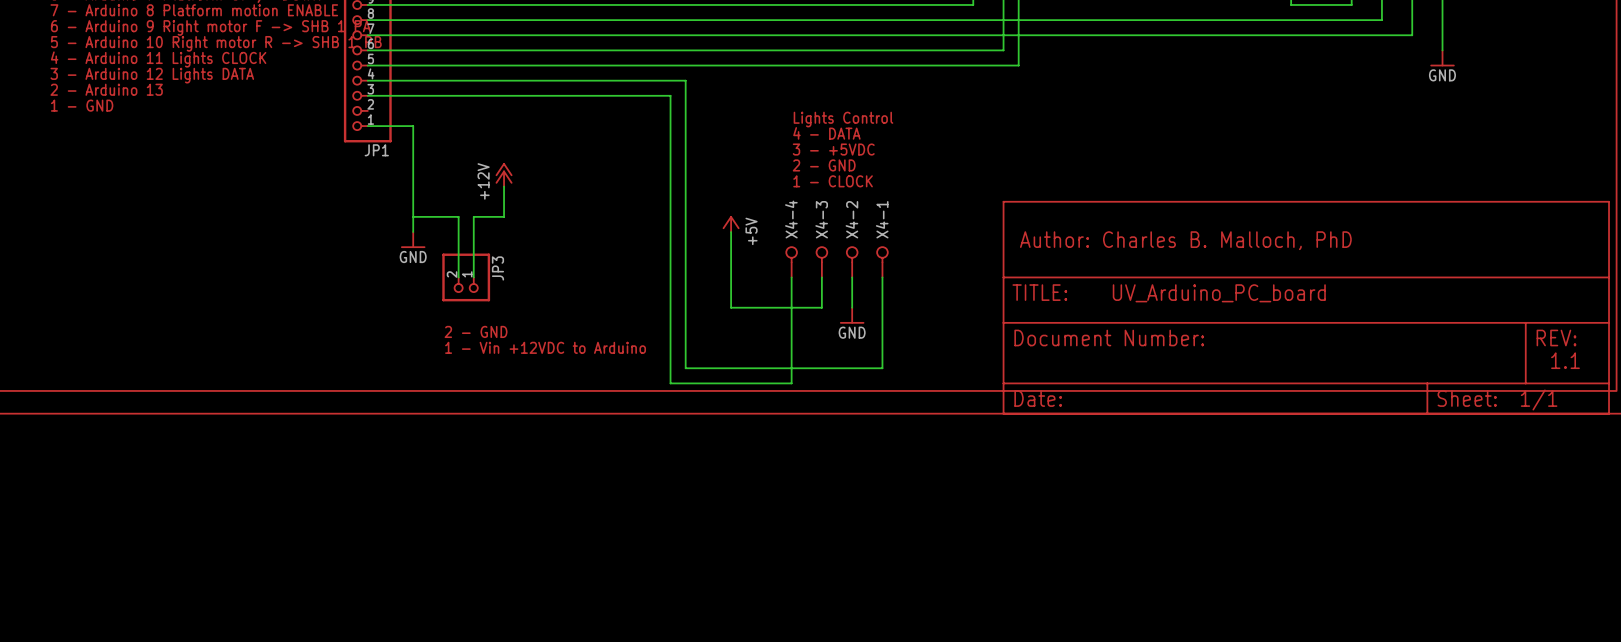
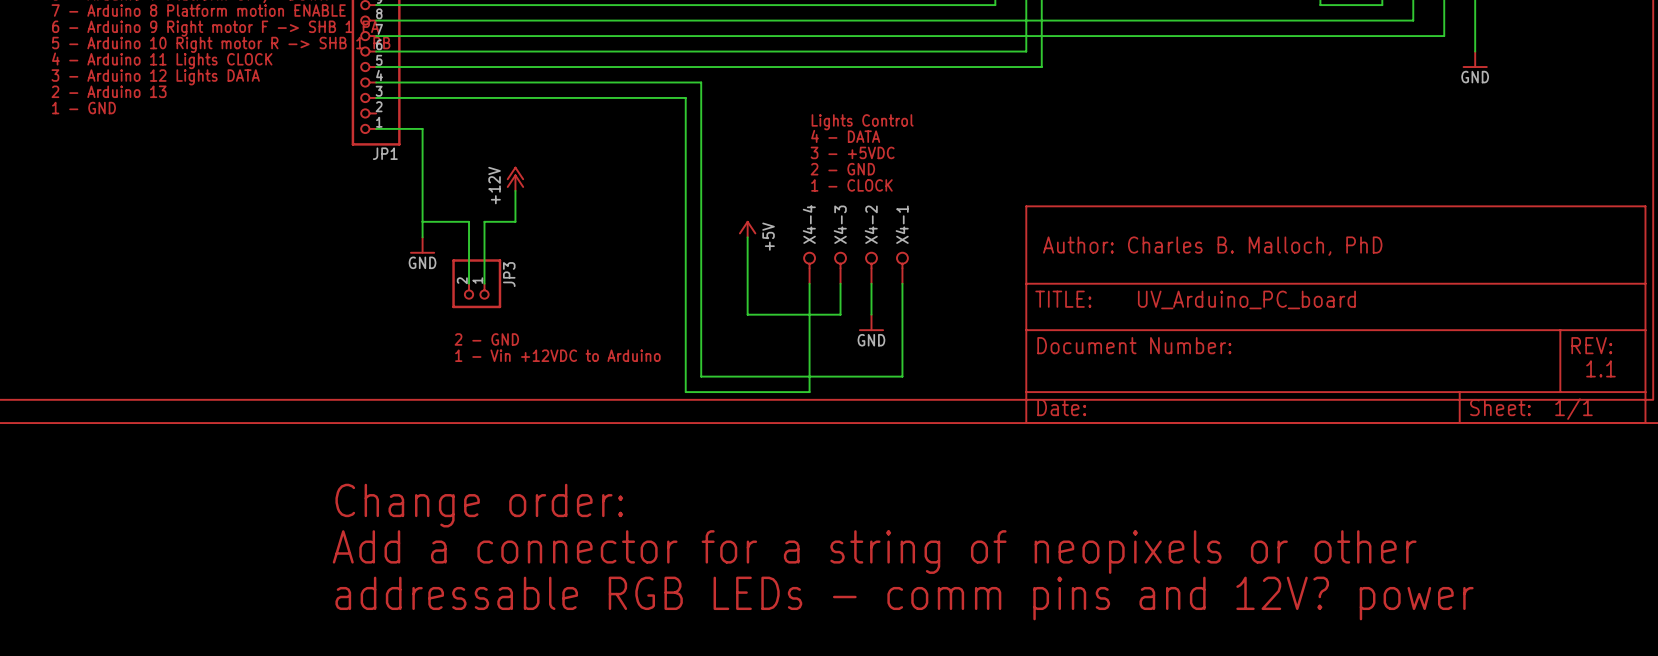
text: none -> Change order: (479, 505)
text: none -> Add a connector for a string of neopixels or other (874, 552)
text: none -> addressable RGB LEDs - comm pins and 12V? power (904, 598)

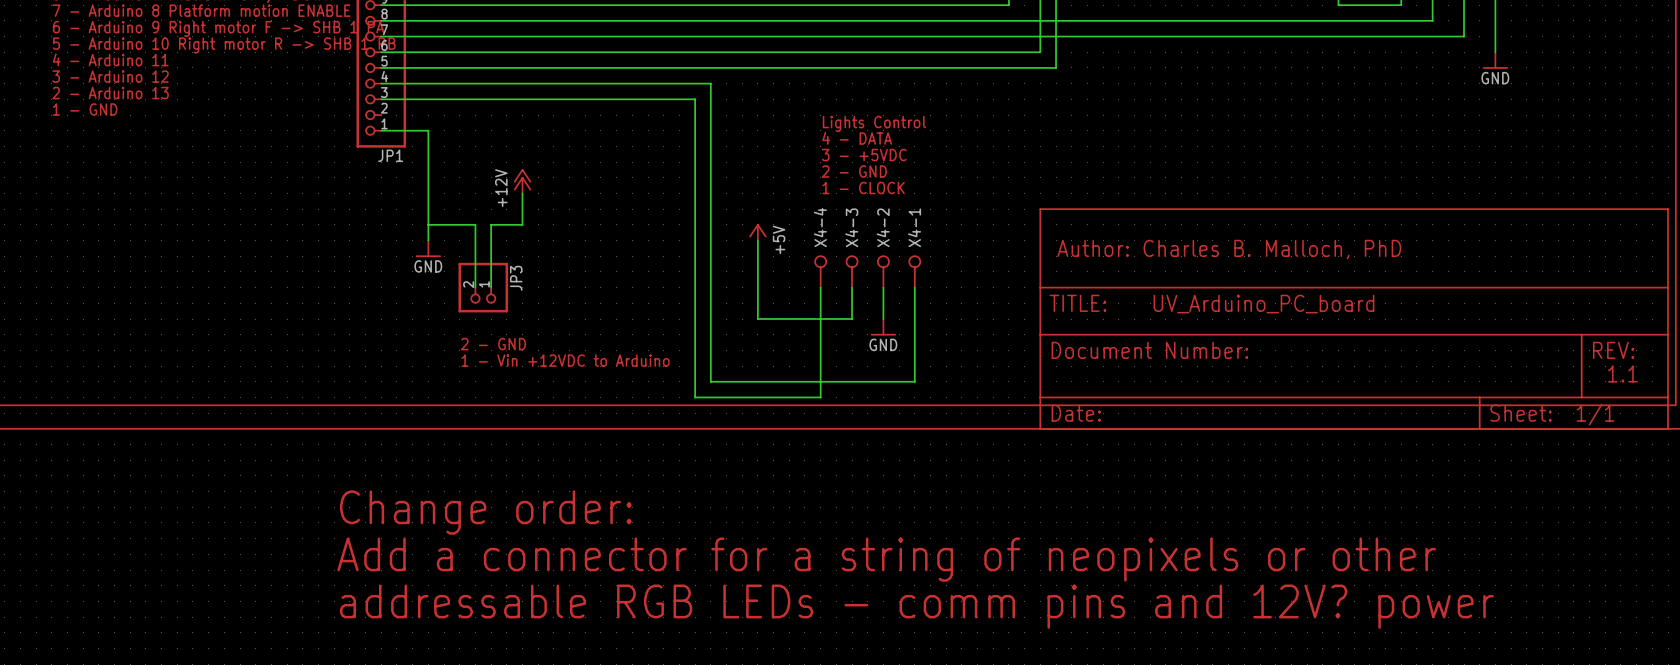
text: 4 - Arduino 11 Lights CLOCK (162, 60) -> 4 - Arduino 11 (110, 59)
text: 3 - Arduino 12 Lights DATA (155, 77) -> 3 - Arduino 12 (110, 76)

